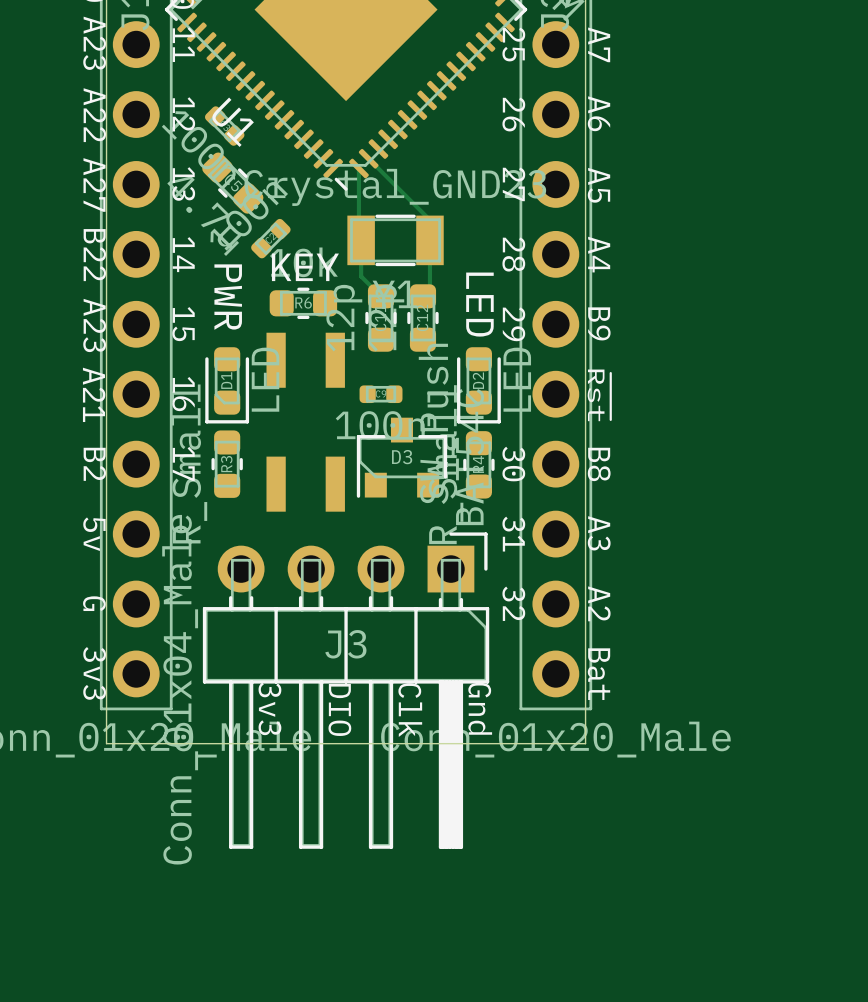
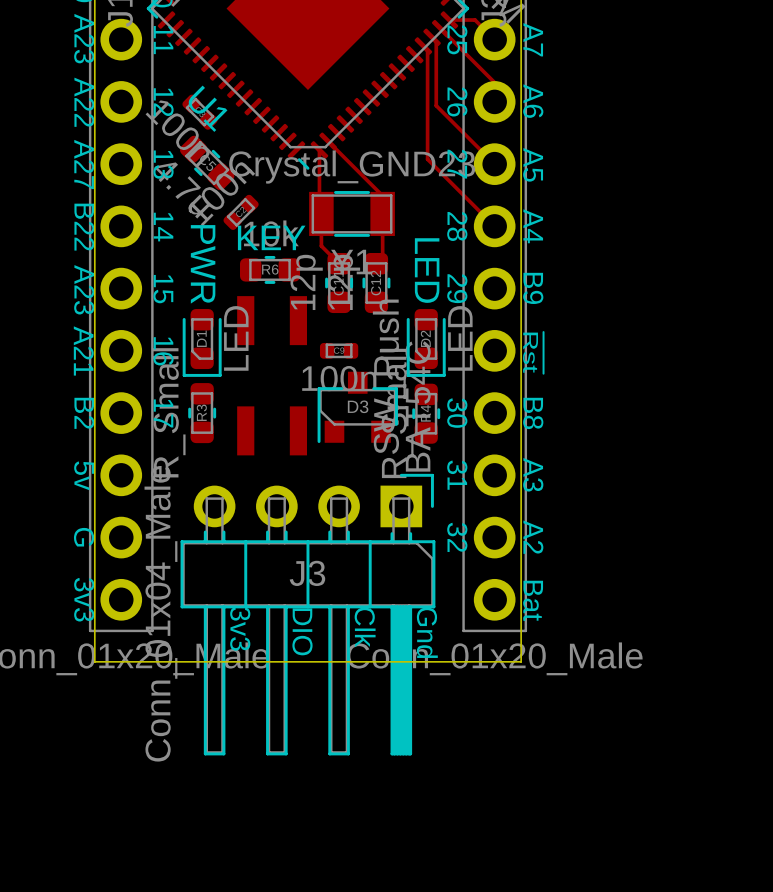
track: none -> (449, 20) (475, 20) (494, 39)
track: none -> (440, 28) (494, 82) (494, 101)
track: none -> (432, 37) (436, 41) (436, 105) (494, 164)
track: none -> (423, 46) (427, 50) (427, 159) (494, 226)

